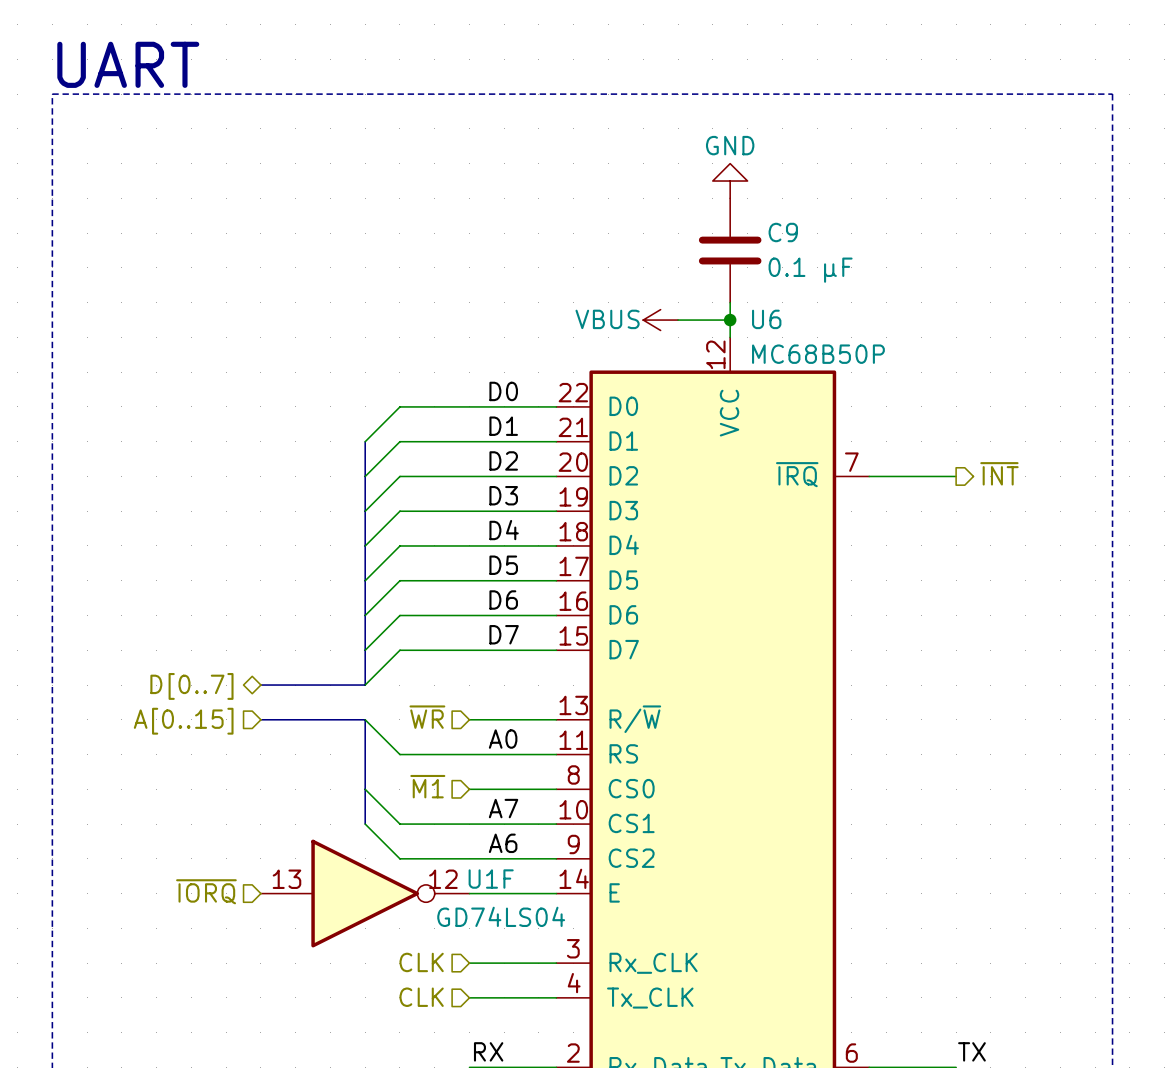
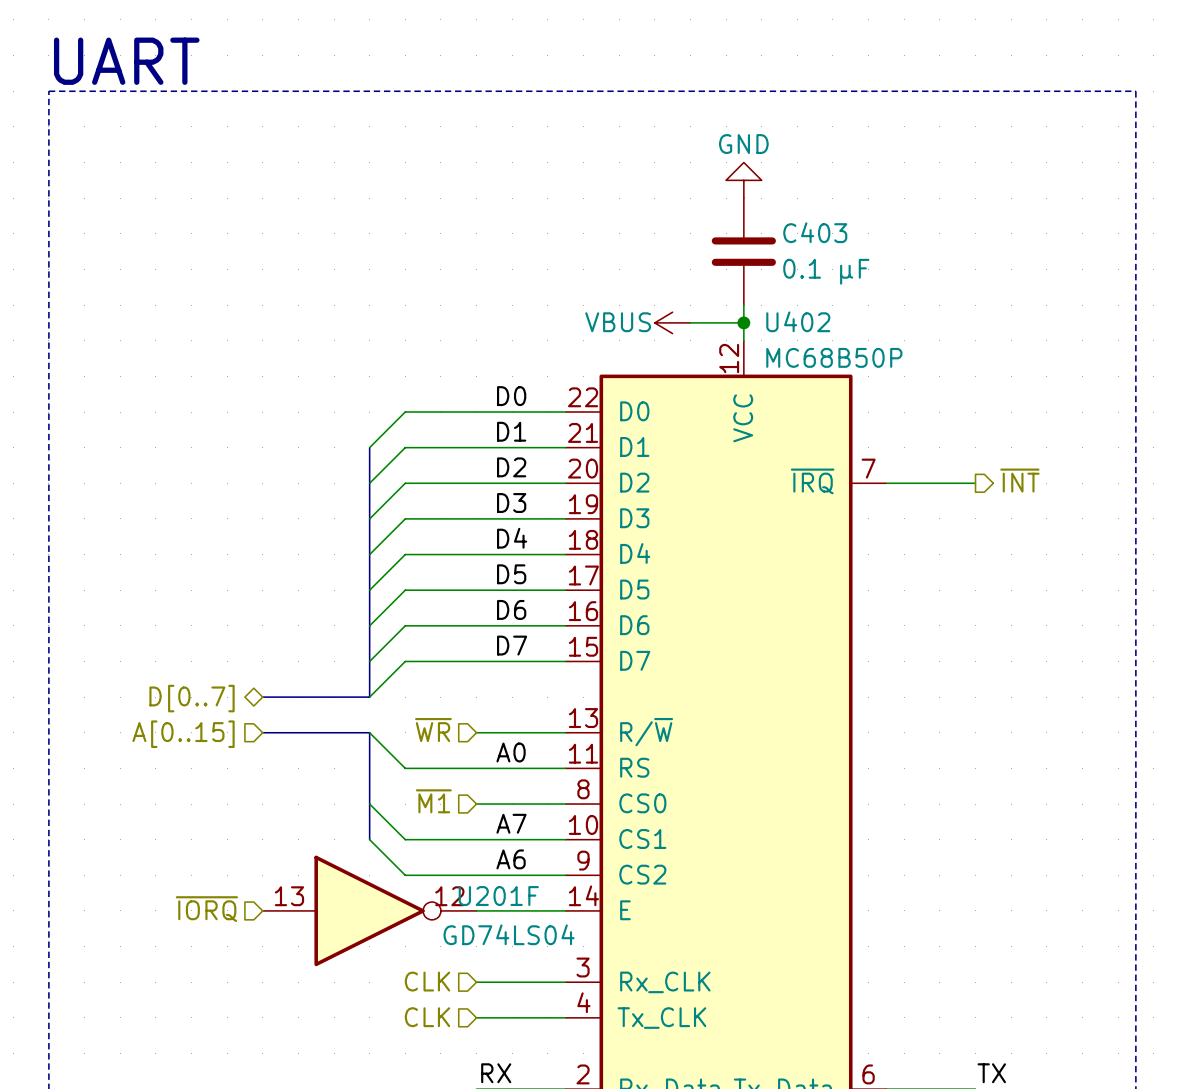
C9 name: C9 (783, 232) -> C403 (815, 232)
U6 name: U6 (766, 319) -> U402 (798, 321)
U1F name: U1F (491, 879) -> U201F (498, 896)

